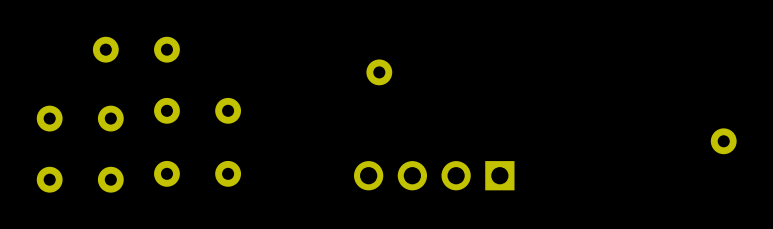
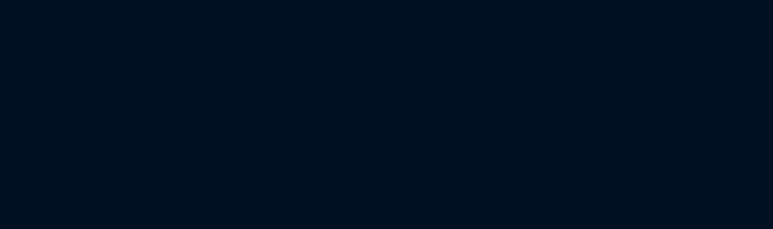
part: (105, 49) -> none
part: (166, 49) -> none
part: (379, 72) -> none
part: (166, 110) -> none
part: (228, 110) -> none
part: (49, 118) -> none
part: (110, 118) -> none
part: (723, 141) -> none
part: (166, 173) -> none
part: (228, 173) -> none
part: (434, 175) -> none
part: (49, 179) -> none
part: (110, 179) -> none

